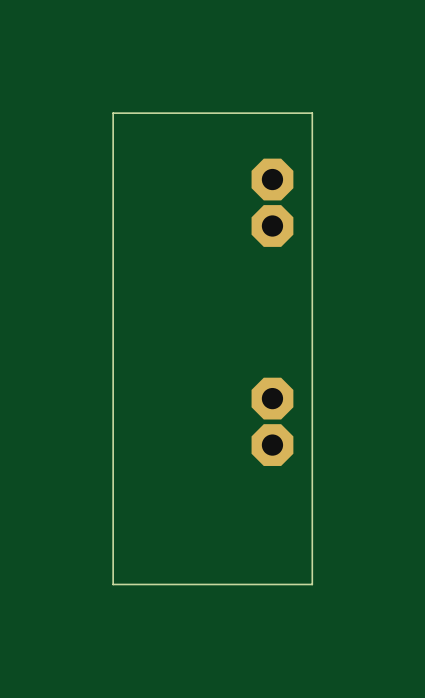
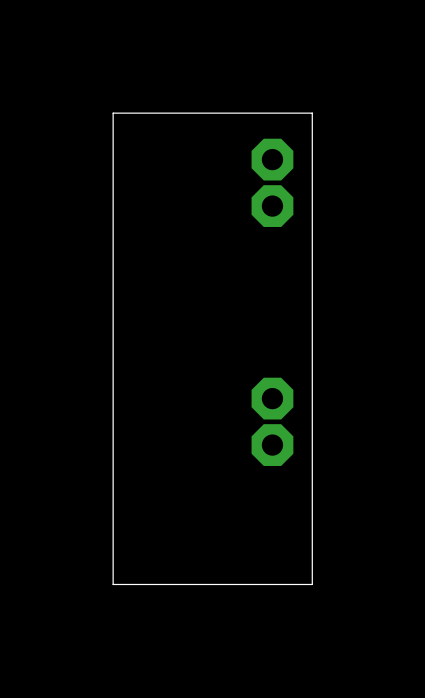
part: none -> (272, 159)
part: (272, 179) -> none
part: none -> (272, 206)
part: (272, 225) -> none

